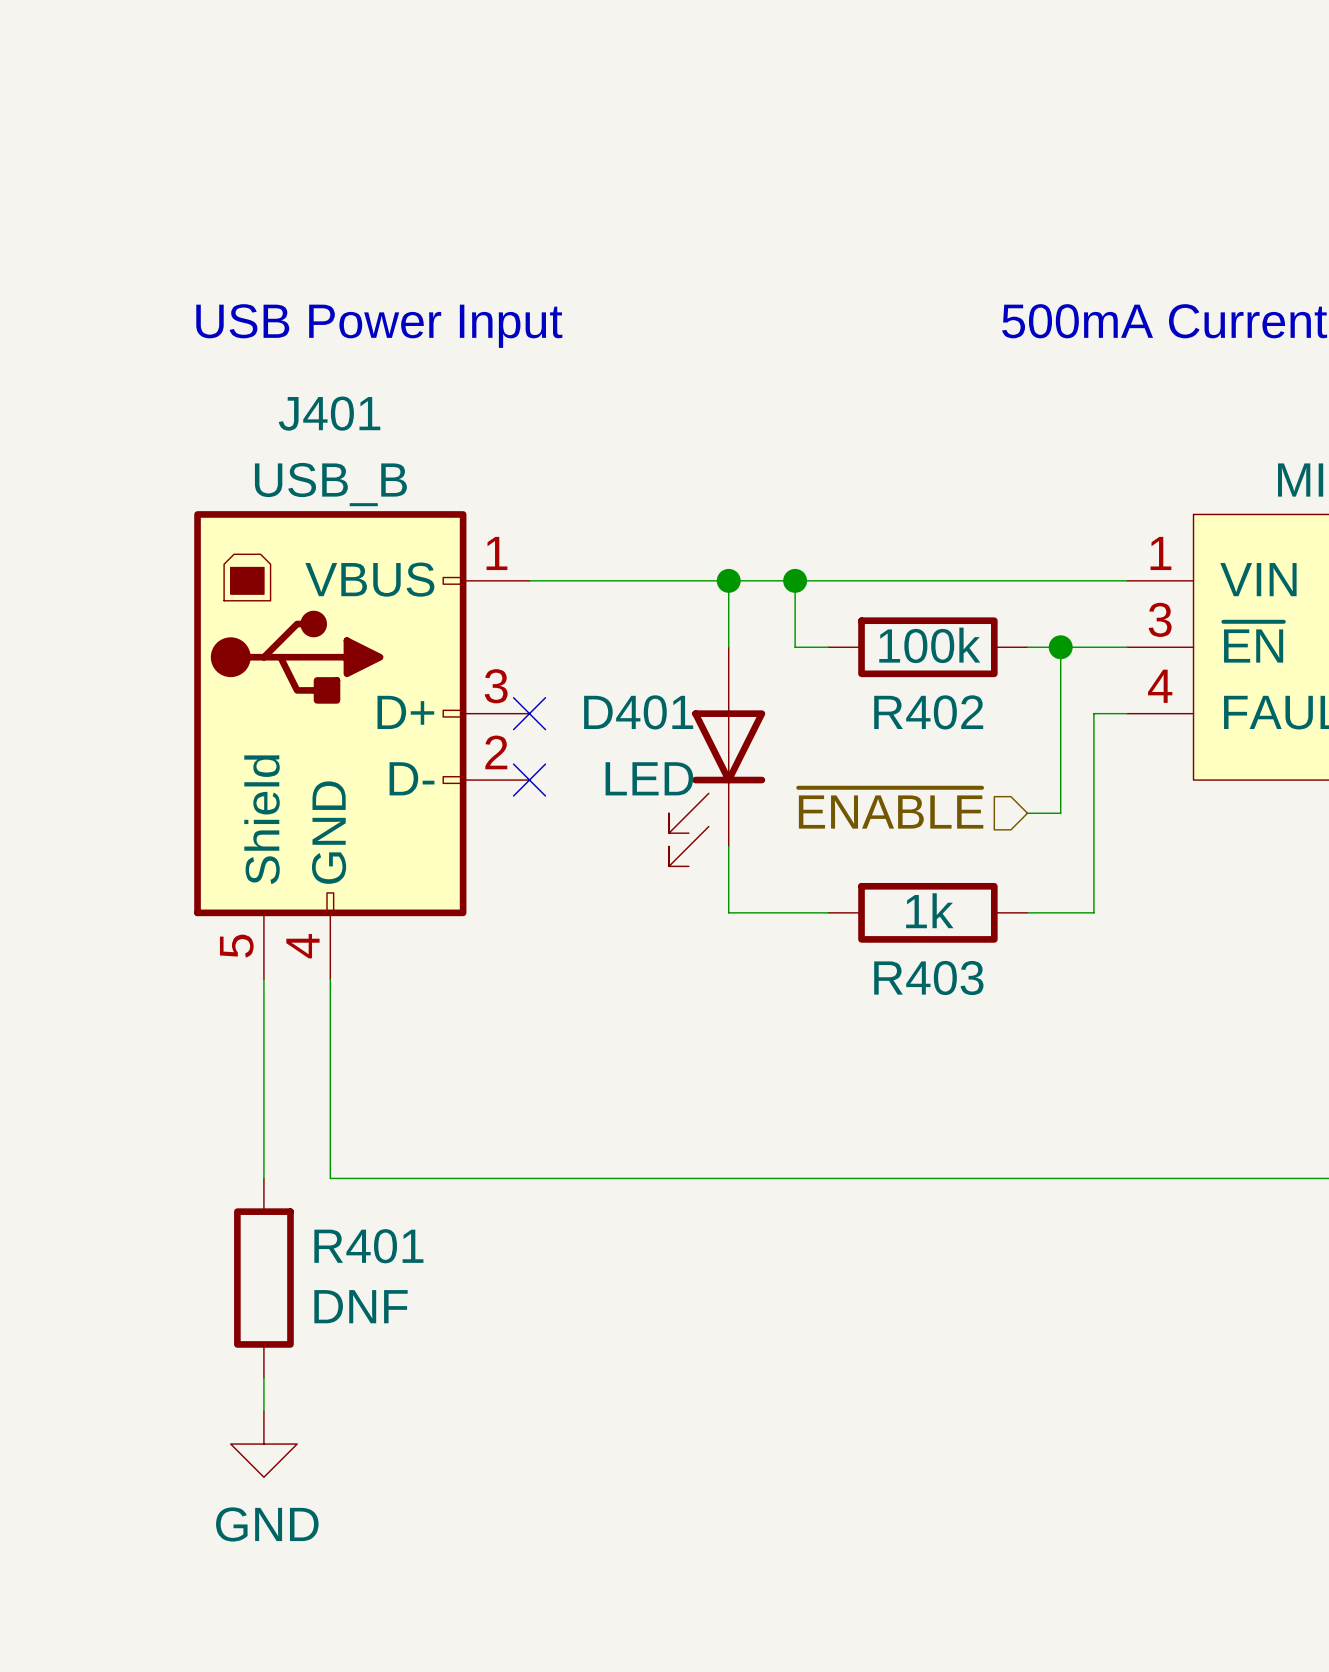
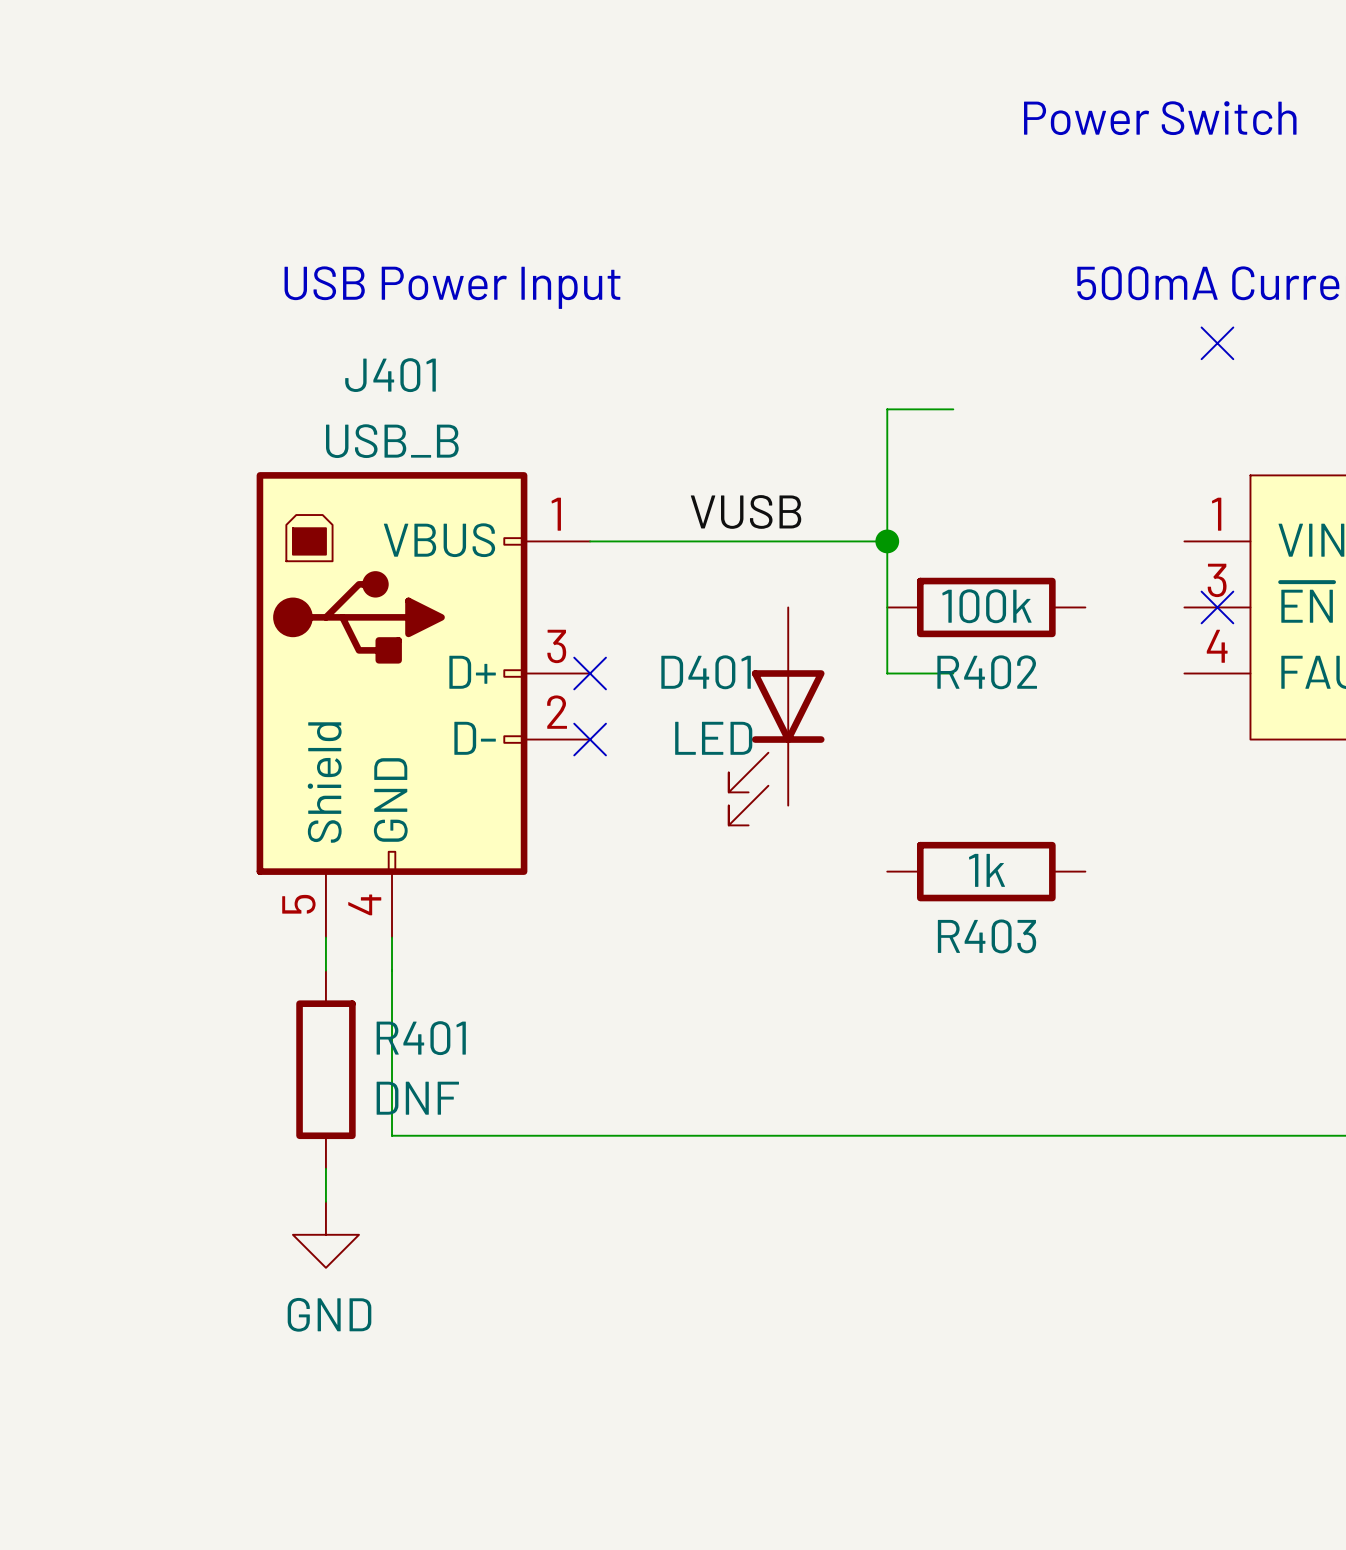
text: none -> Power Switch (1160, 118)
no-connect mark: none -> (1217, 343)
wire: none -> (953, 409) (887, 409) (887, 673) (953, 673)
label: none -> VUSB (746, 511)
wire: (728, 580) (728, 647) -> none
junction: (728, 580) -> none
wire: (795, 580) (795, 647) (828, 647) -> none
junction position: (795, 580) -> (887, 541)
wire: (828, 580) (1127, 580) -> none
wire: (1027, 647) (1127, 647) -> none
wire: (1060, 647) (1060, 813) (1027, 813) -> none
junction: (1060, 647) -> none
no-connect mark: none -> (1217, 607)
wire: (1127, 713) (1093, 713) (1093, 912) (1027, 912) -> none
hierarchical label: ~{ENABLE} (890, 808) -> none
wire: (728, 846) (728, 912) (828, 912) -> none
wire: (263, 1012) (263, 1178) -> none
R401 position: (263, 1278) -> (325, 1069)
wire: (263, 1377) (263, 1410) -> (325, 1168) (325, 1201)
power symbol position: GND (263, 1444) -> GND (325, 1234)

